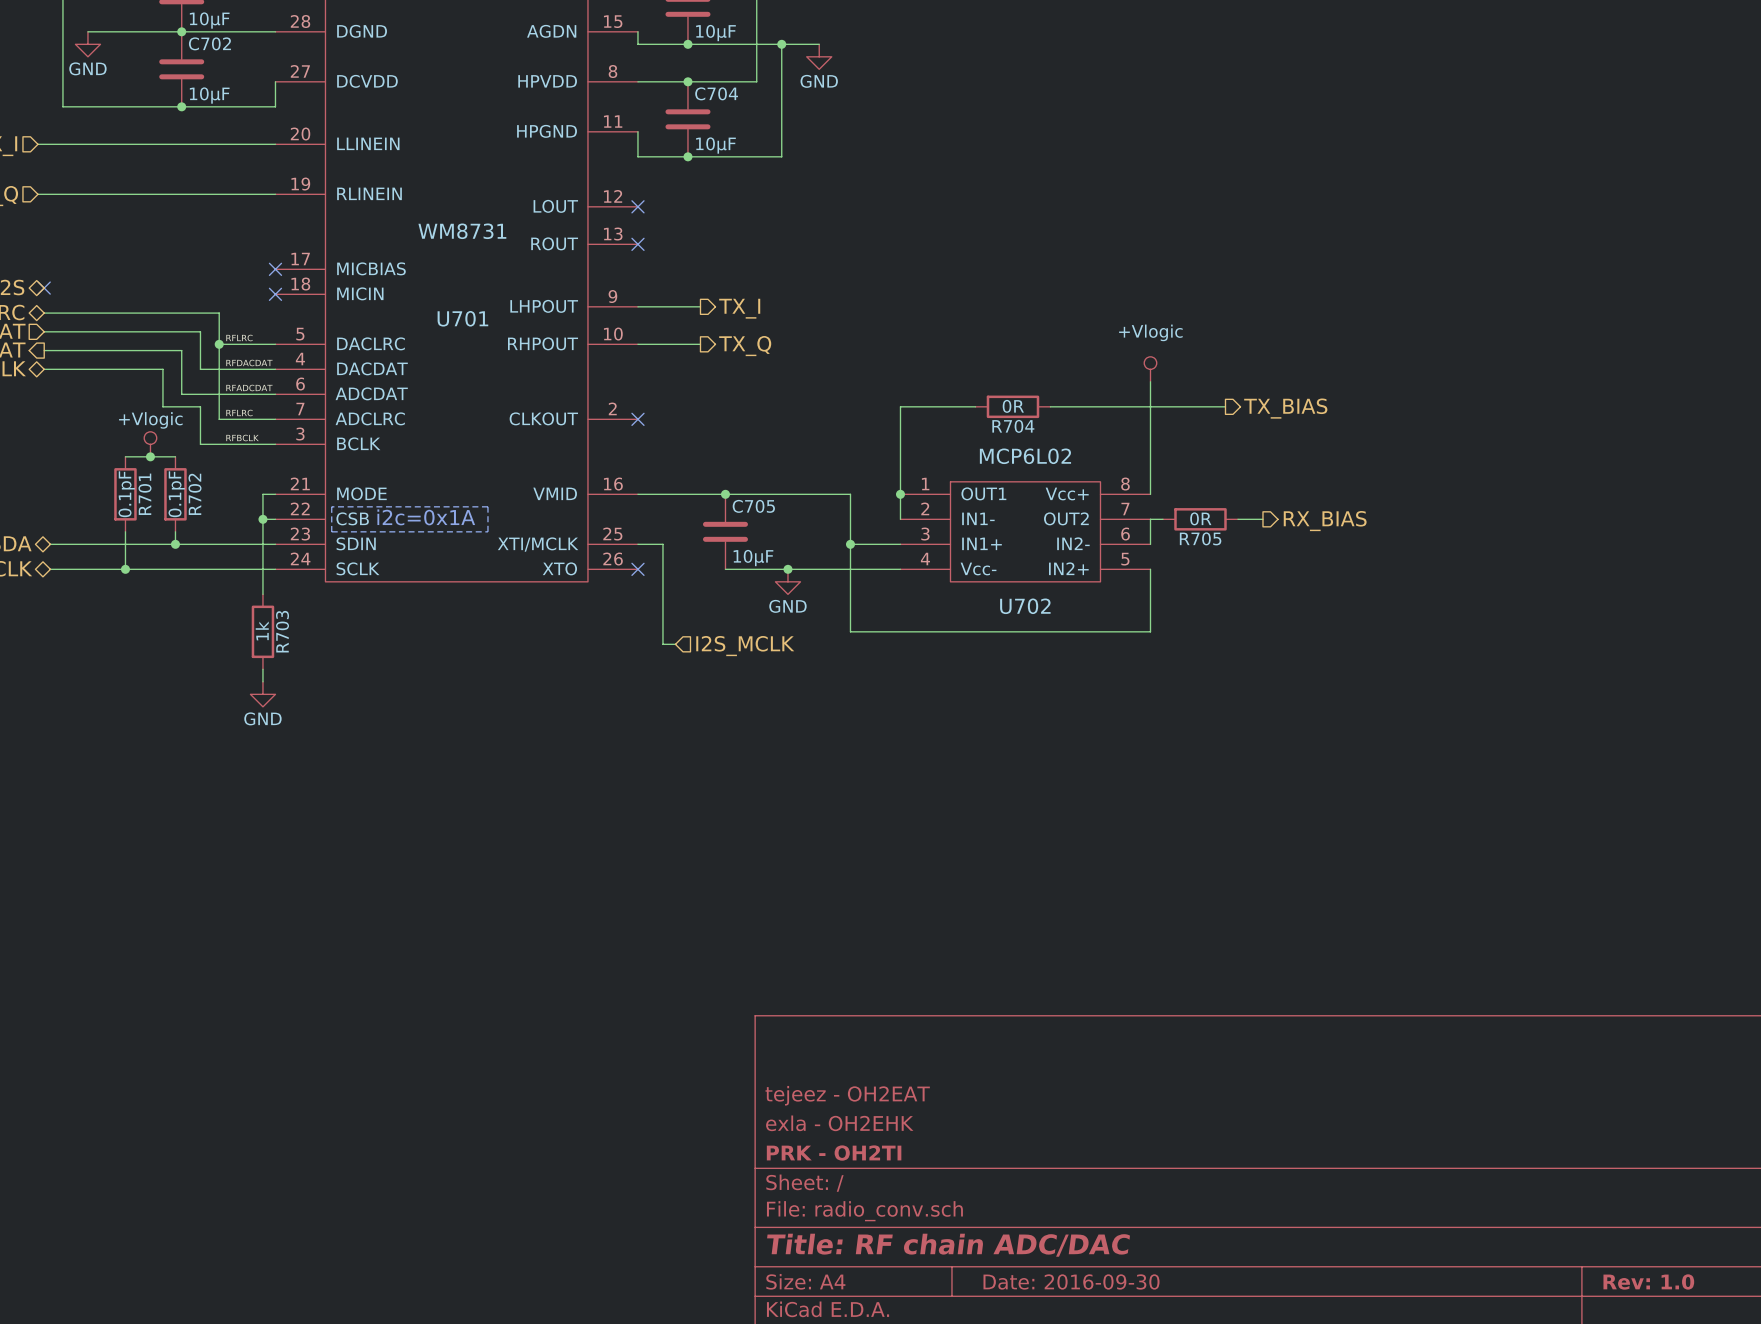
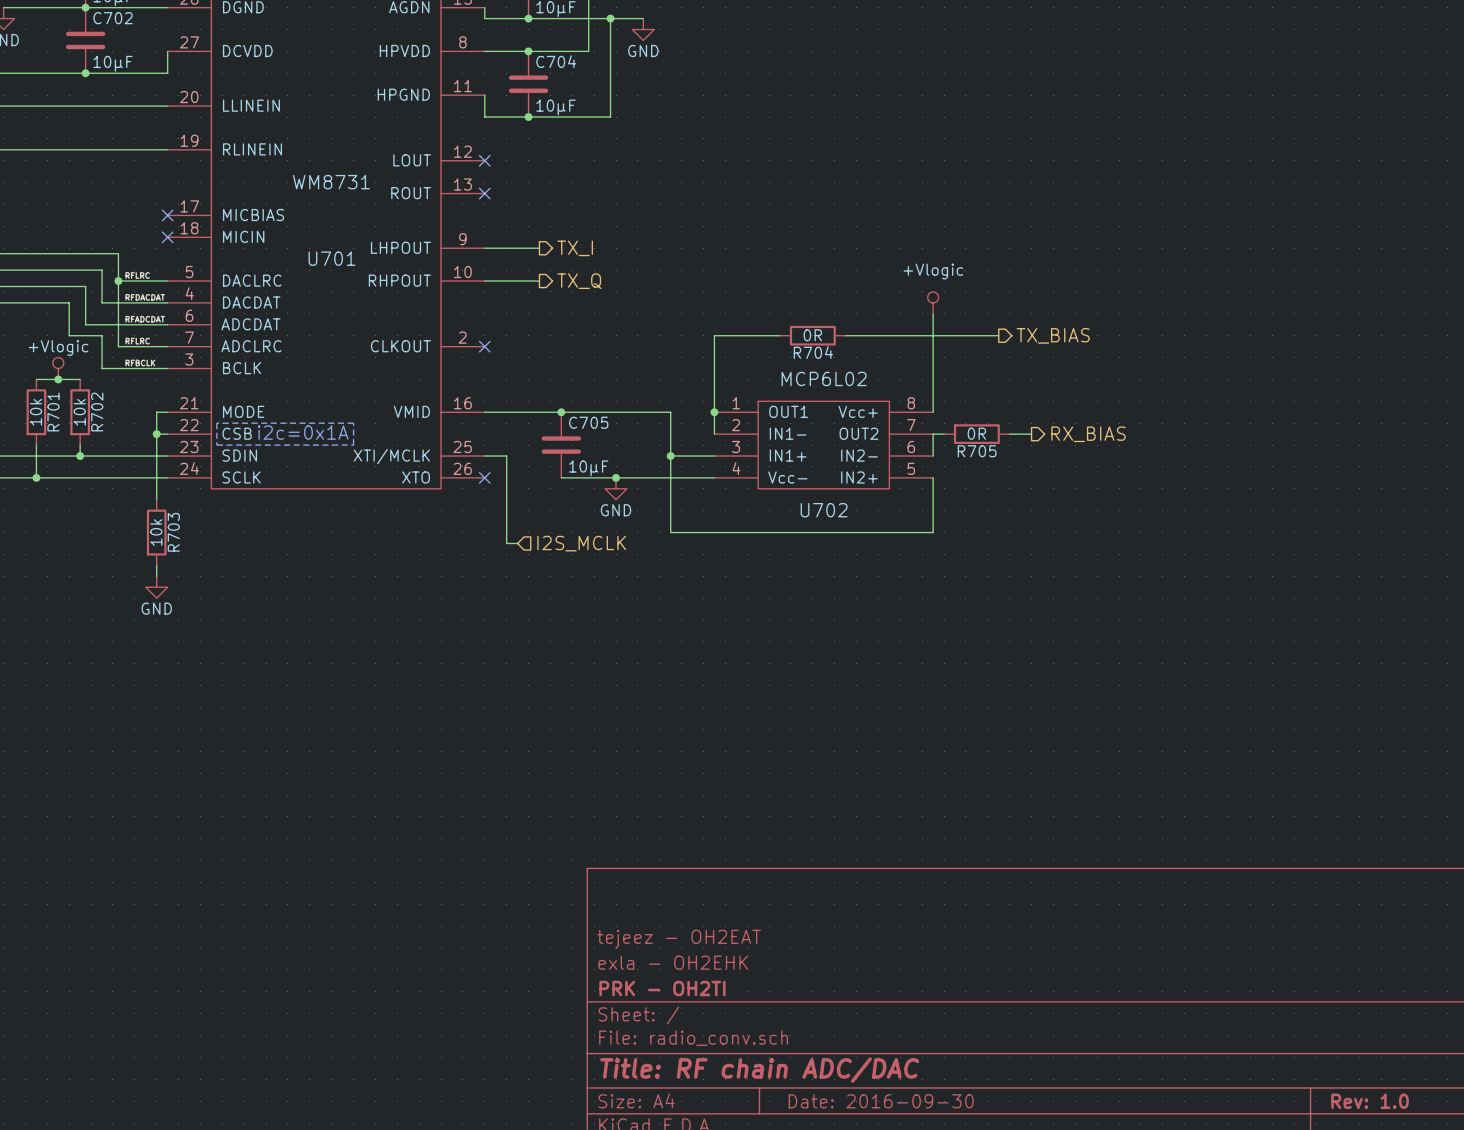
R701 value: 0.1pF (126, 494) -> 10k (36, 412)
R702 value: 0.1pF (176, 494) -> 10k (79, 412)
R703 value: 1k (262, 630) -> 10k (156, 532)

